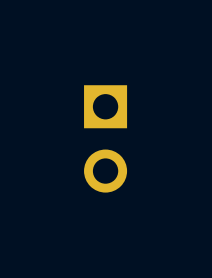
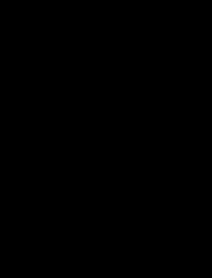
part: (105, 138) -> none

